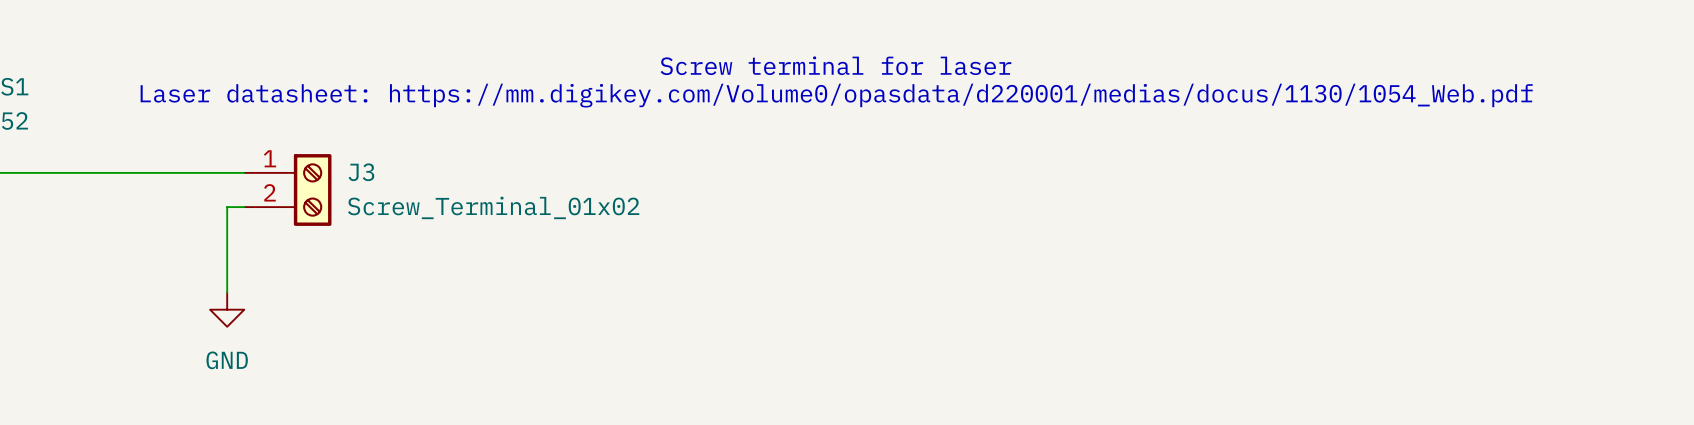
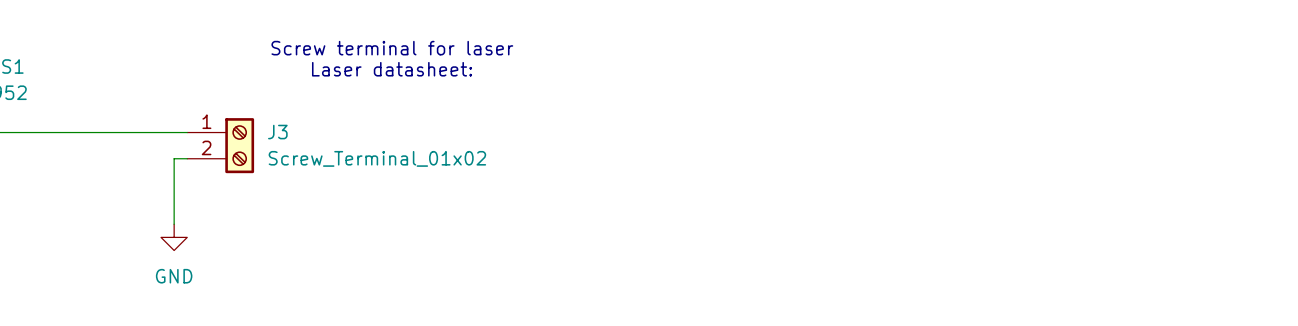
text position: Screw terminal for laser (835, 65) -> Screw terminal for laser (392, 48)
text: none -> Laser datasheet: (392, 69)
text: Laser datasheet: https://mm.digikey.com/Volume0/opasdata/d220001/medias/docus/1130/1054_Web.pdf (836, 95) -> none

